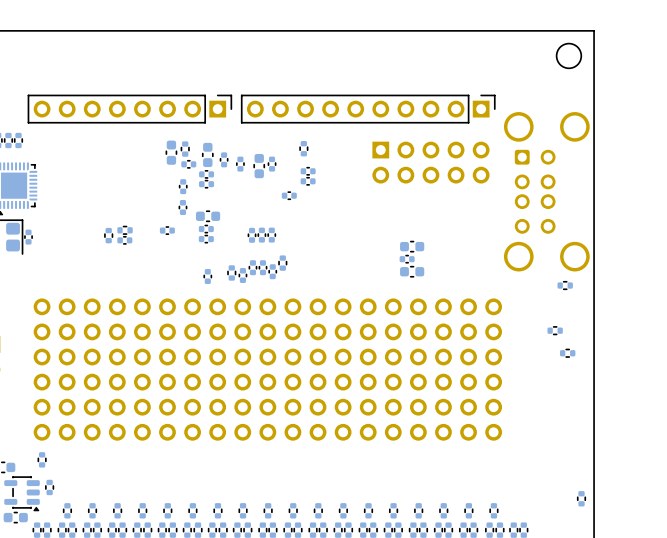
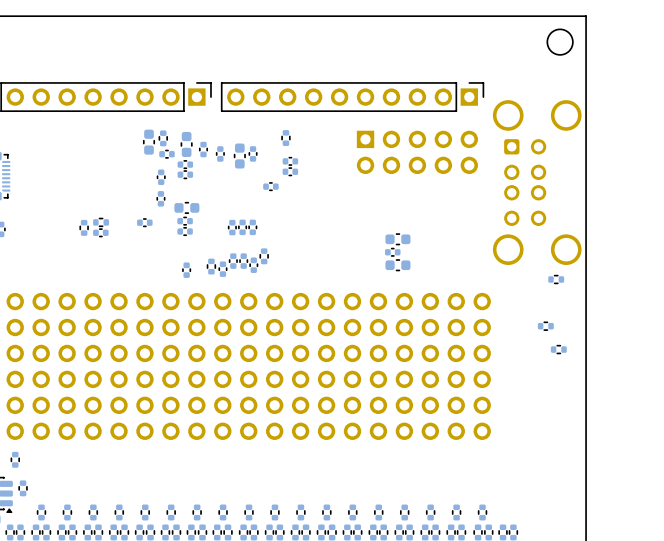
part: (581, 498) -> none

